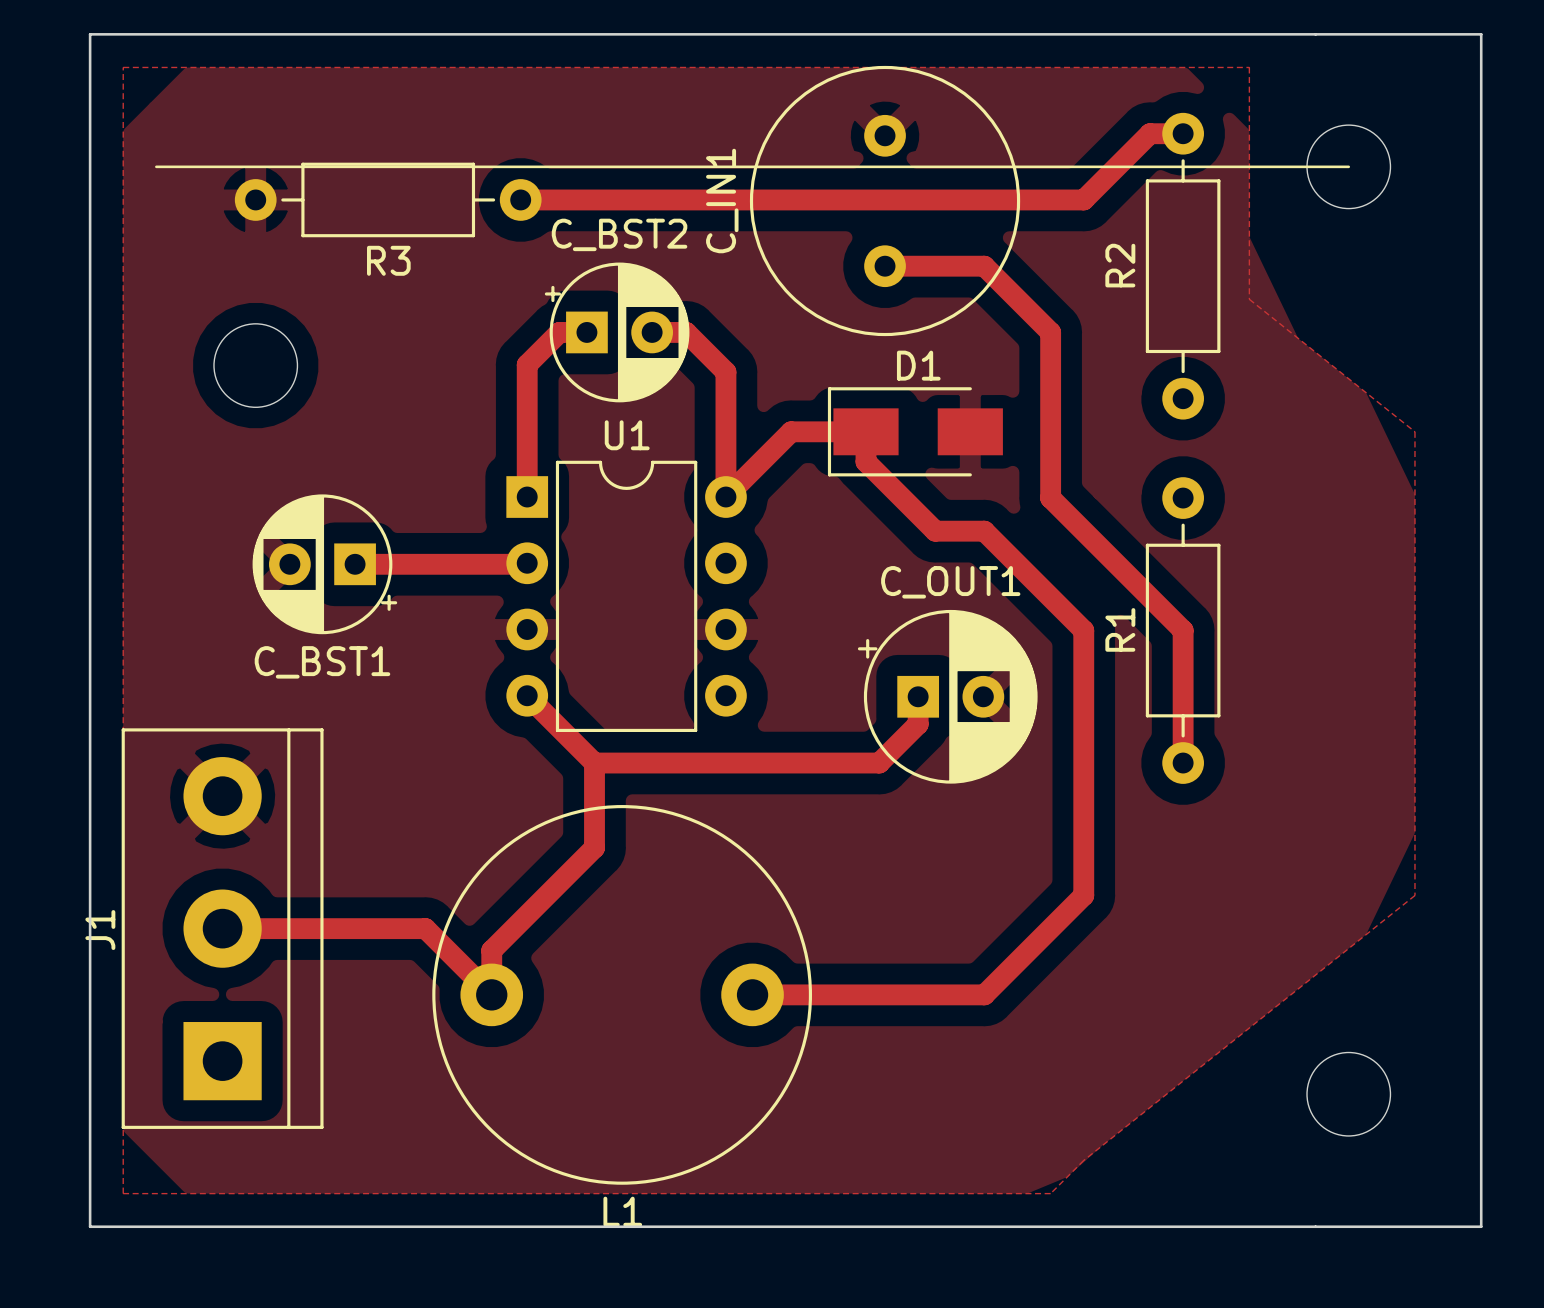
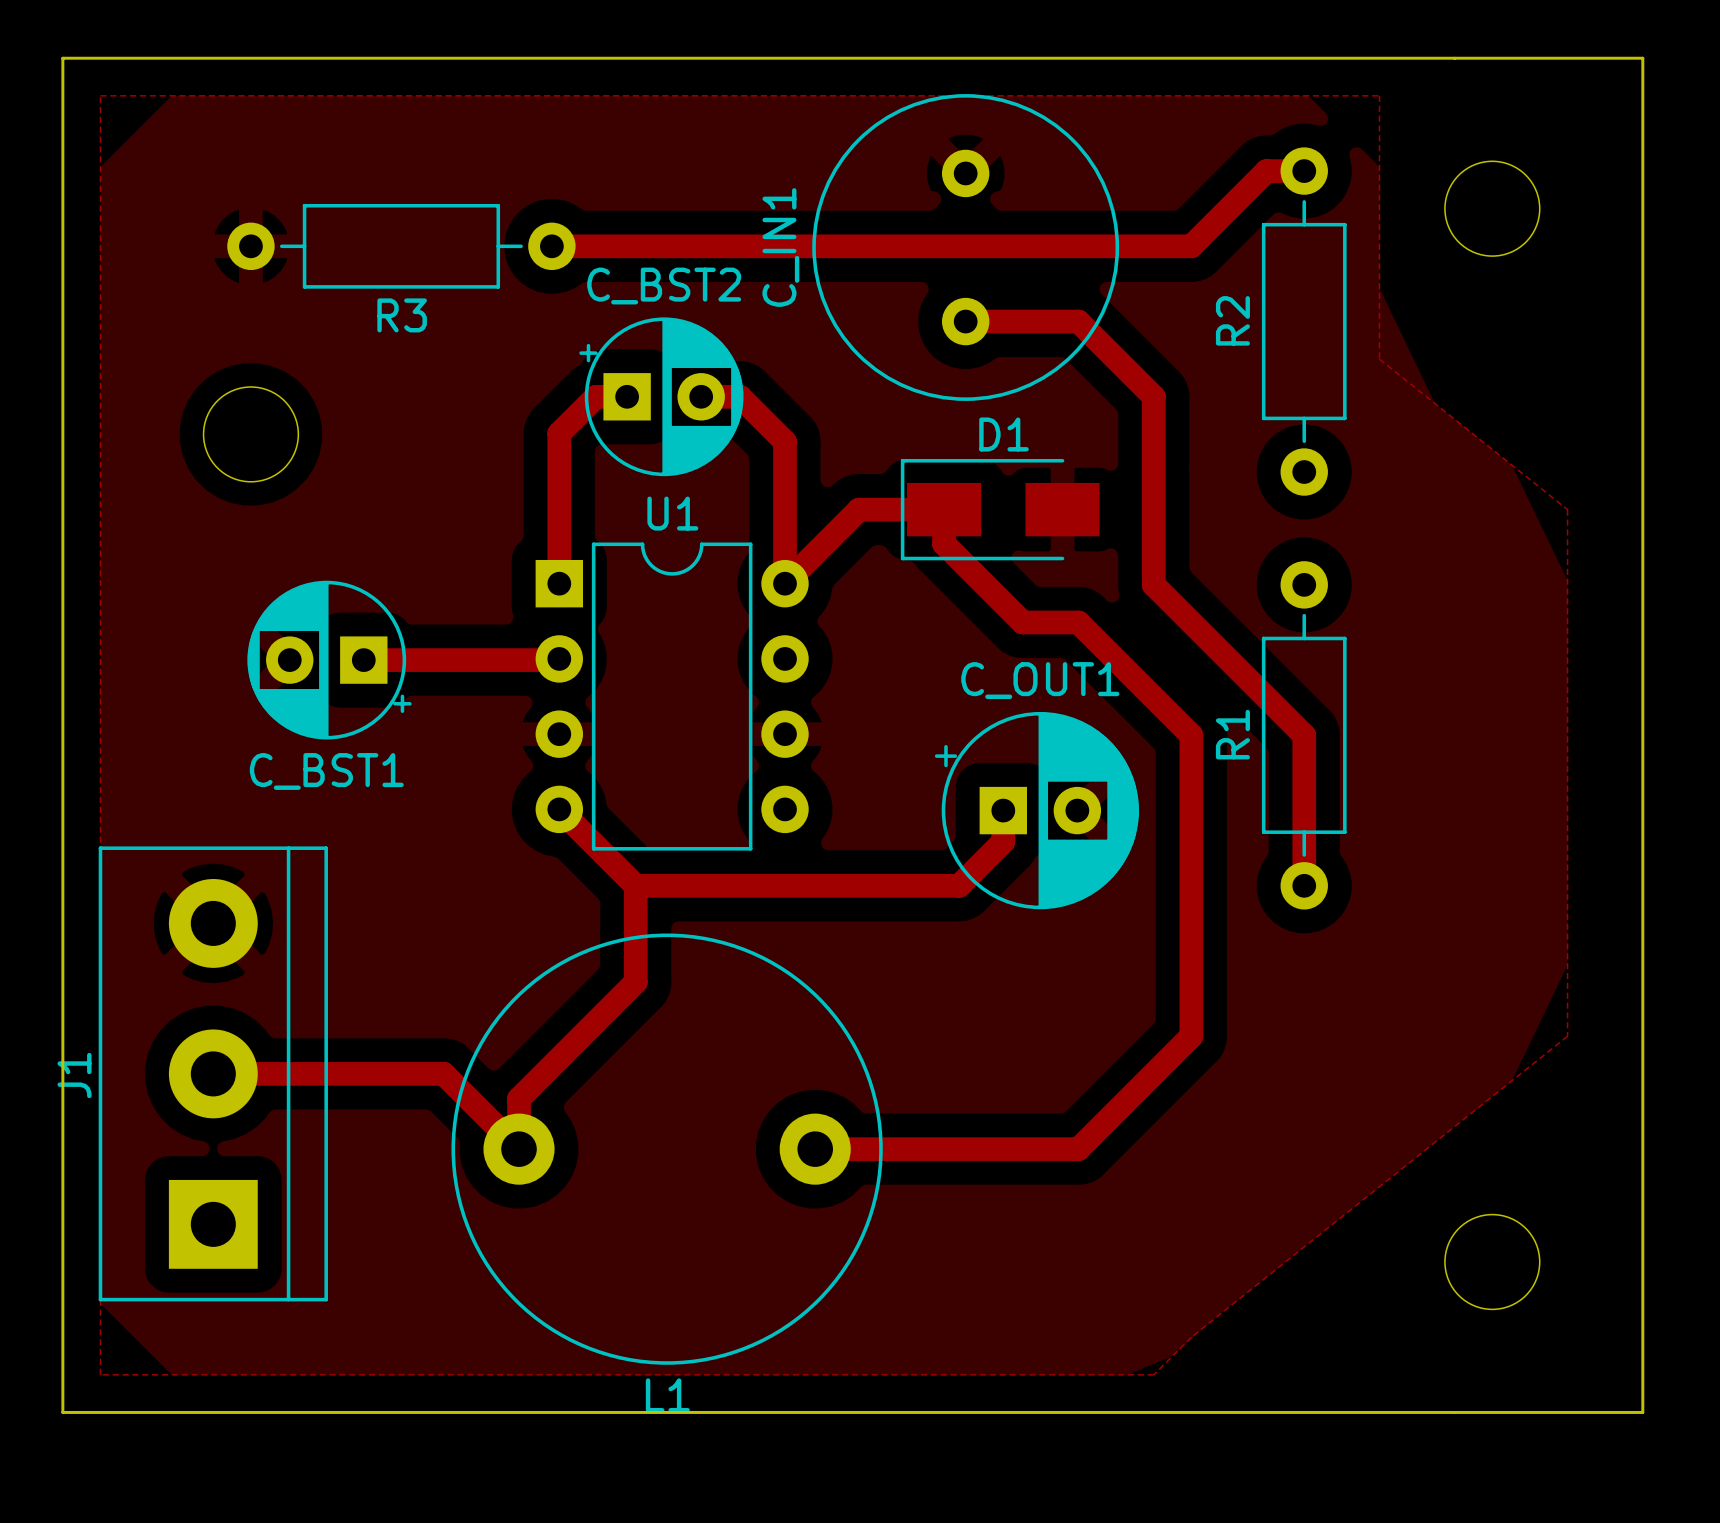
line: (156, 166) (1348, 166) -> none

